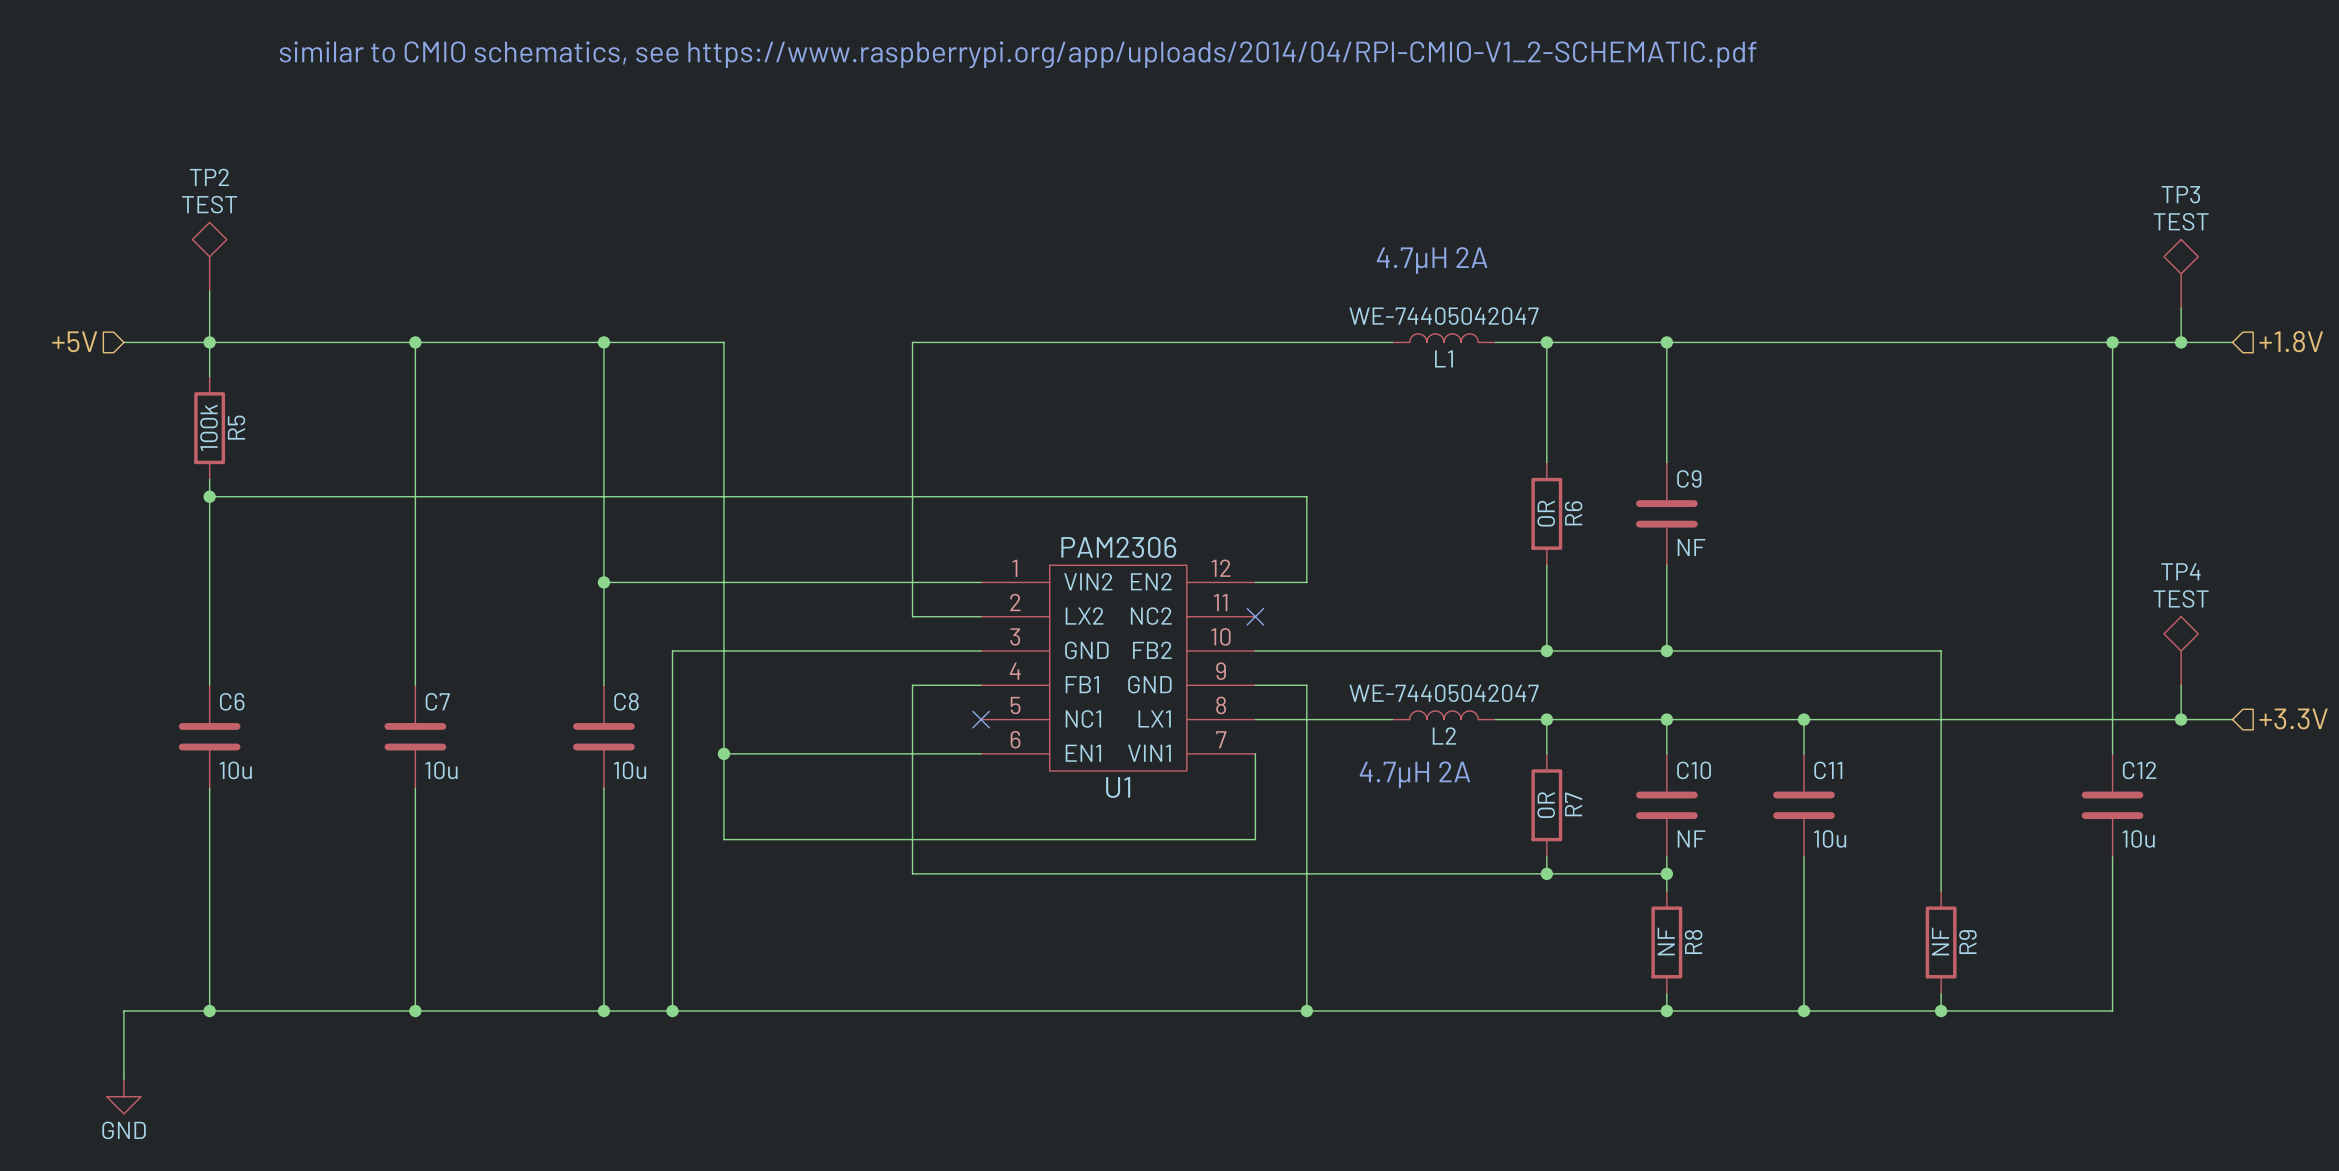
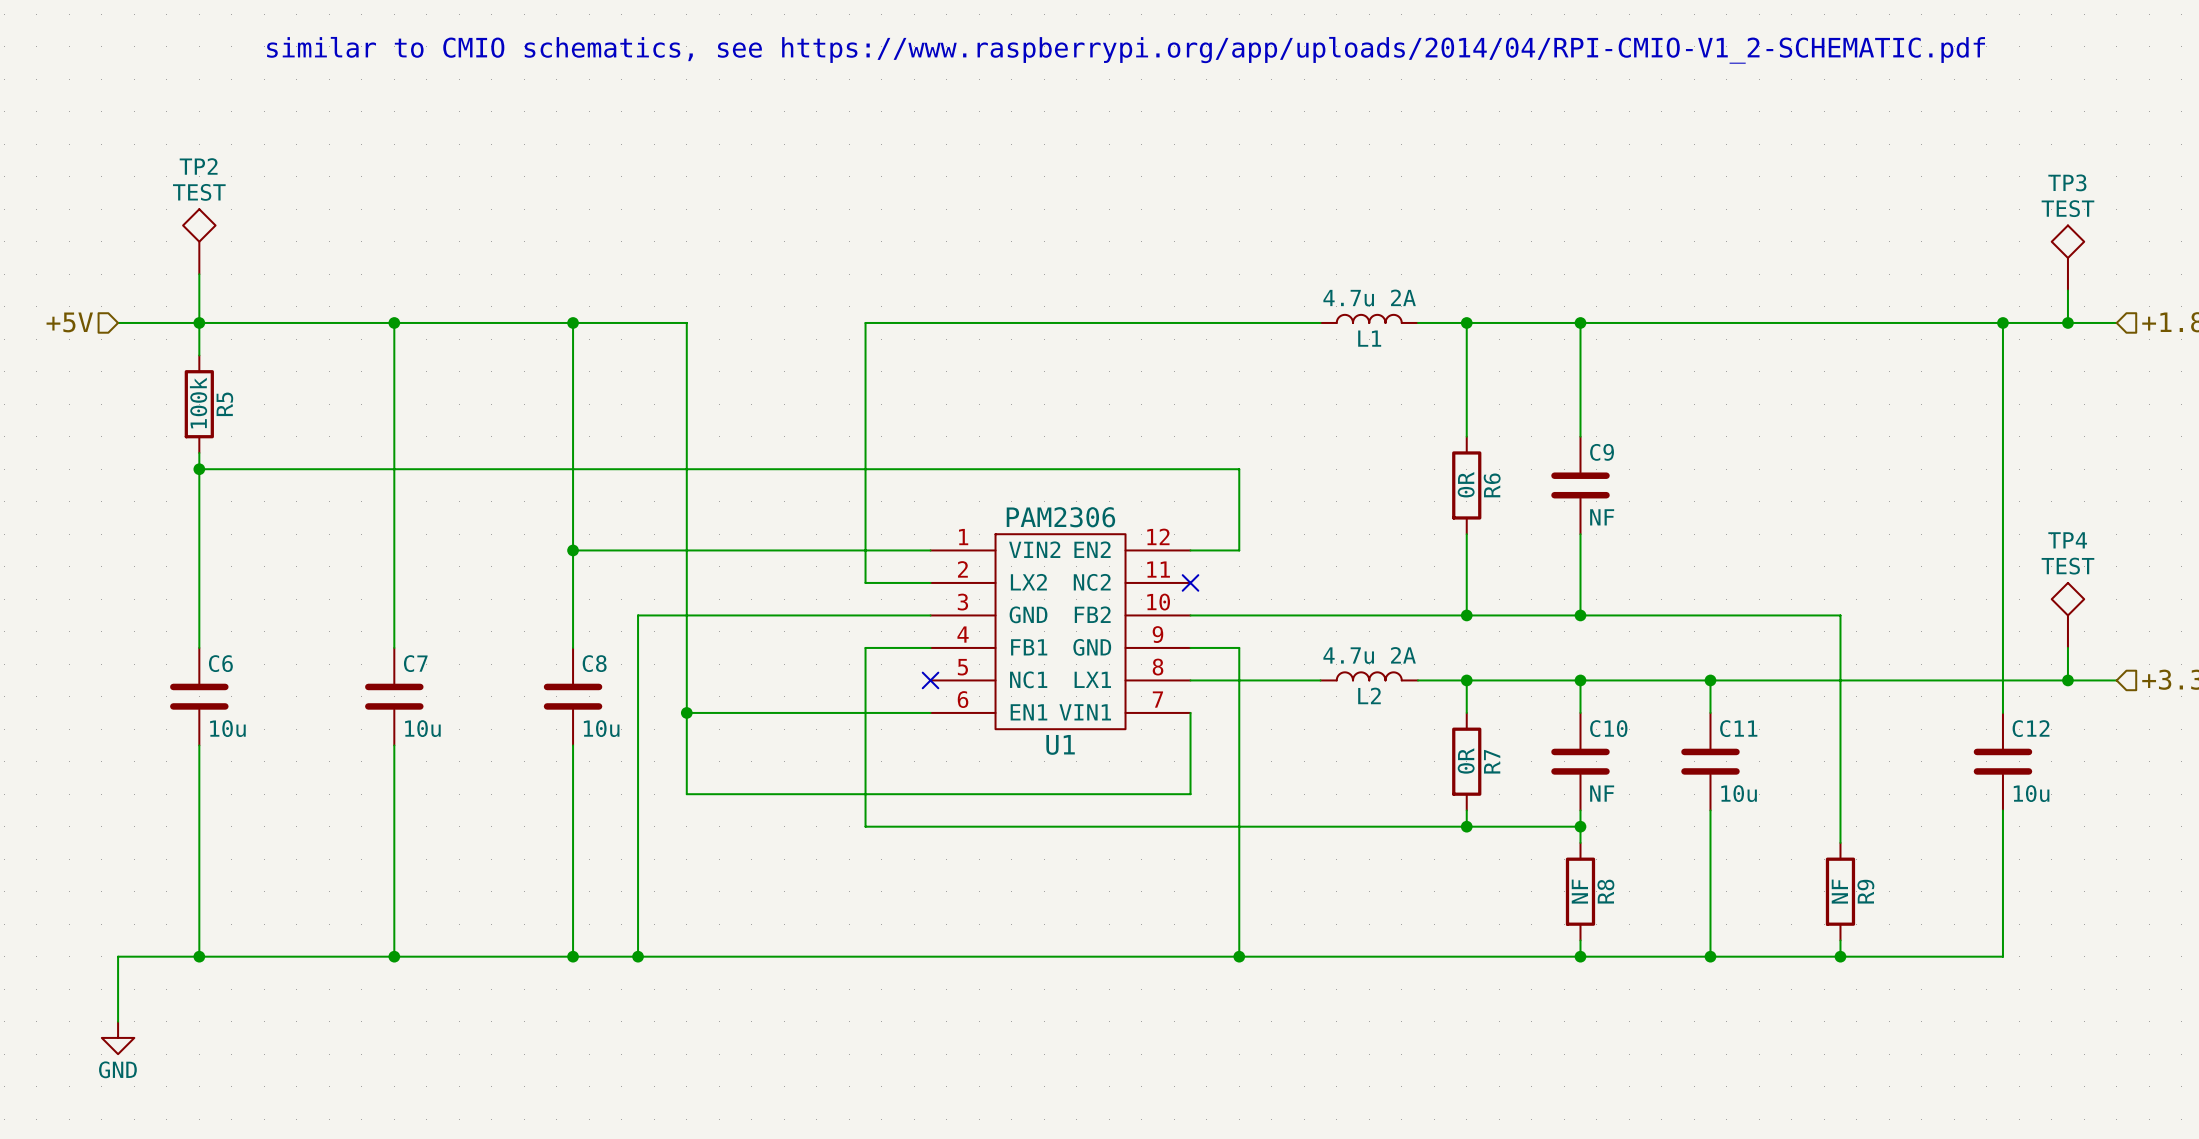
text: 4.7µH 2A (1432, 260) -> none
L1 value: WE-74405042047 (1444, 316) -> 4.7u 2A (1369, 298)
L2 value: WE-74405042047 (1444, 693) -> 4.7u 2A (1369, 655)
text: 4.7µH 2A (1414, 774) -> none

